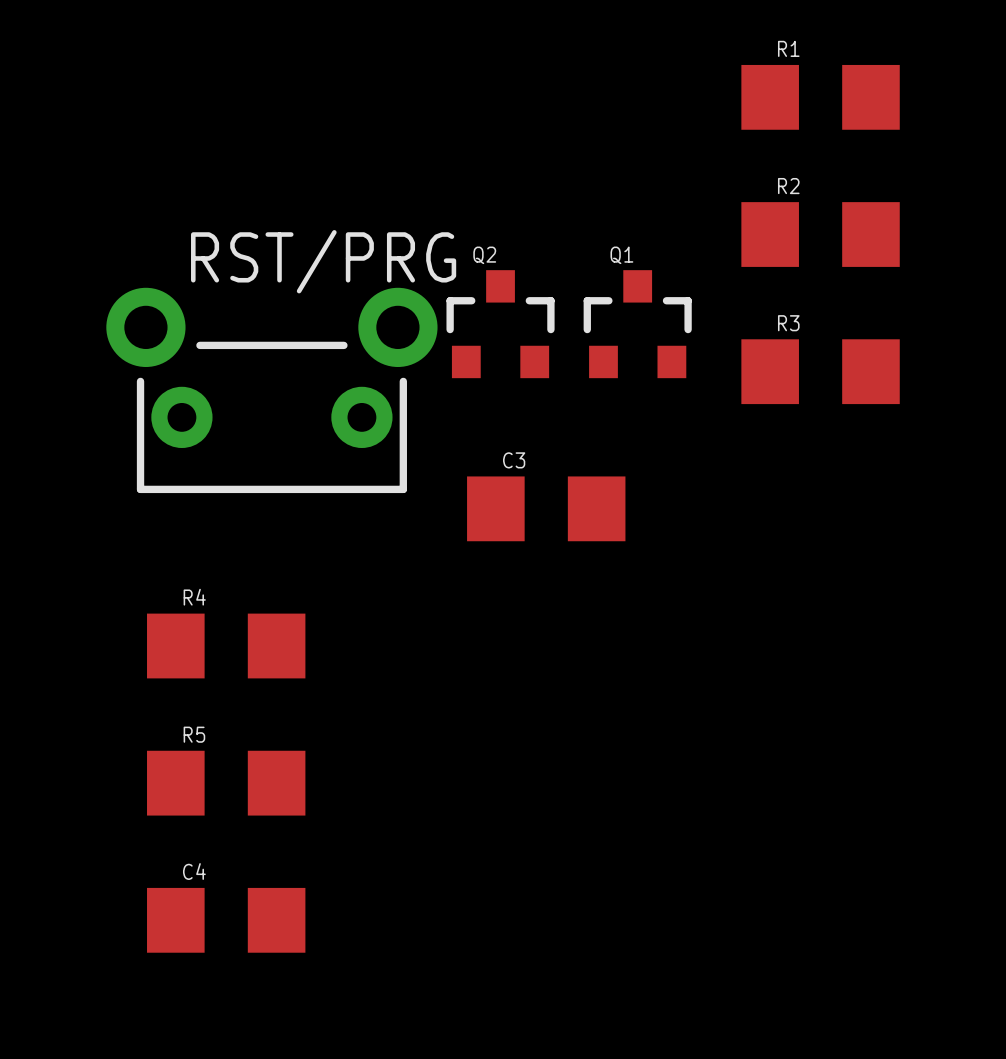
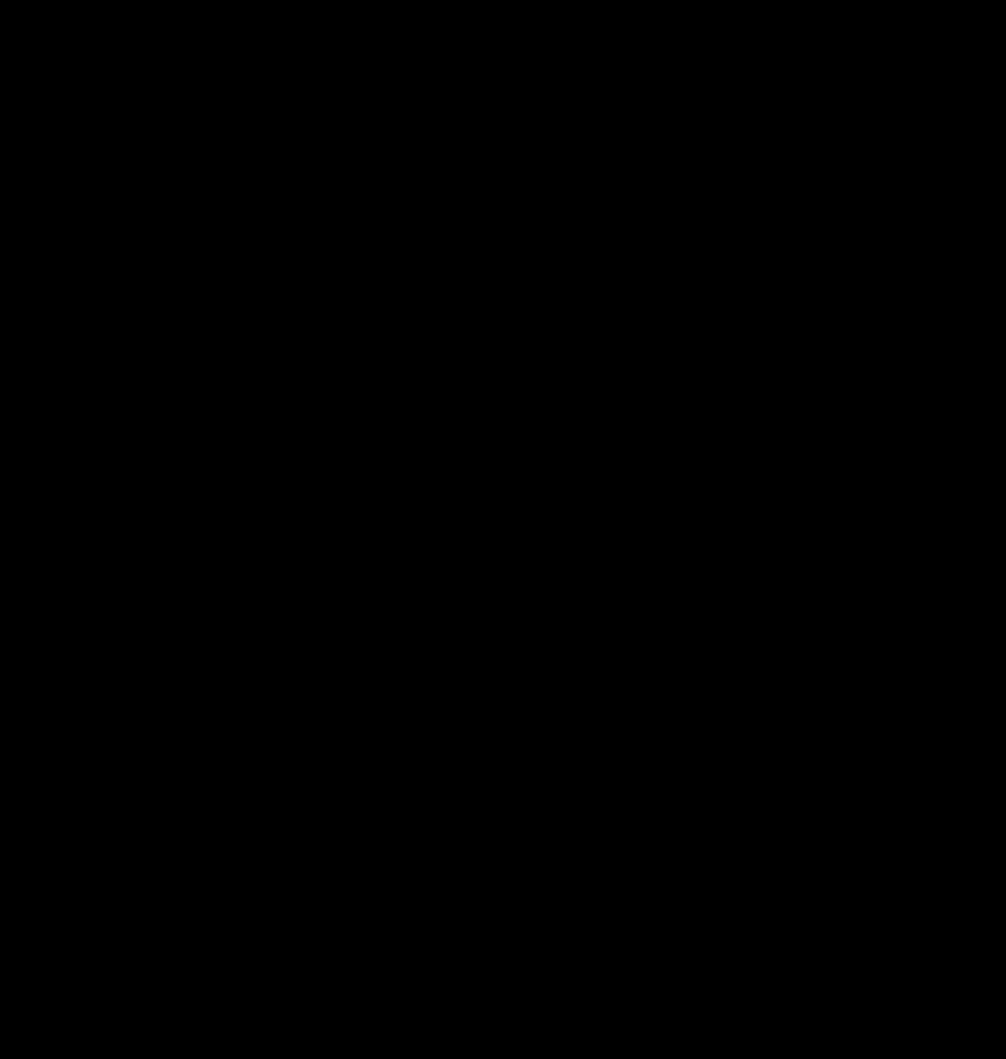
R1: (820, 97) -> none
R2: (820, 234) -> none
Q2: (500, 324) -> none
Q1: (637, 324) -> none
R3: (820, 371) -> none
RST/PRG: (271, 390) -> none
C3: (546, 508) -> none
R4: (226, 646) -> none
R5: (226, 783) -> none
C4: (226, 920) -> none

